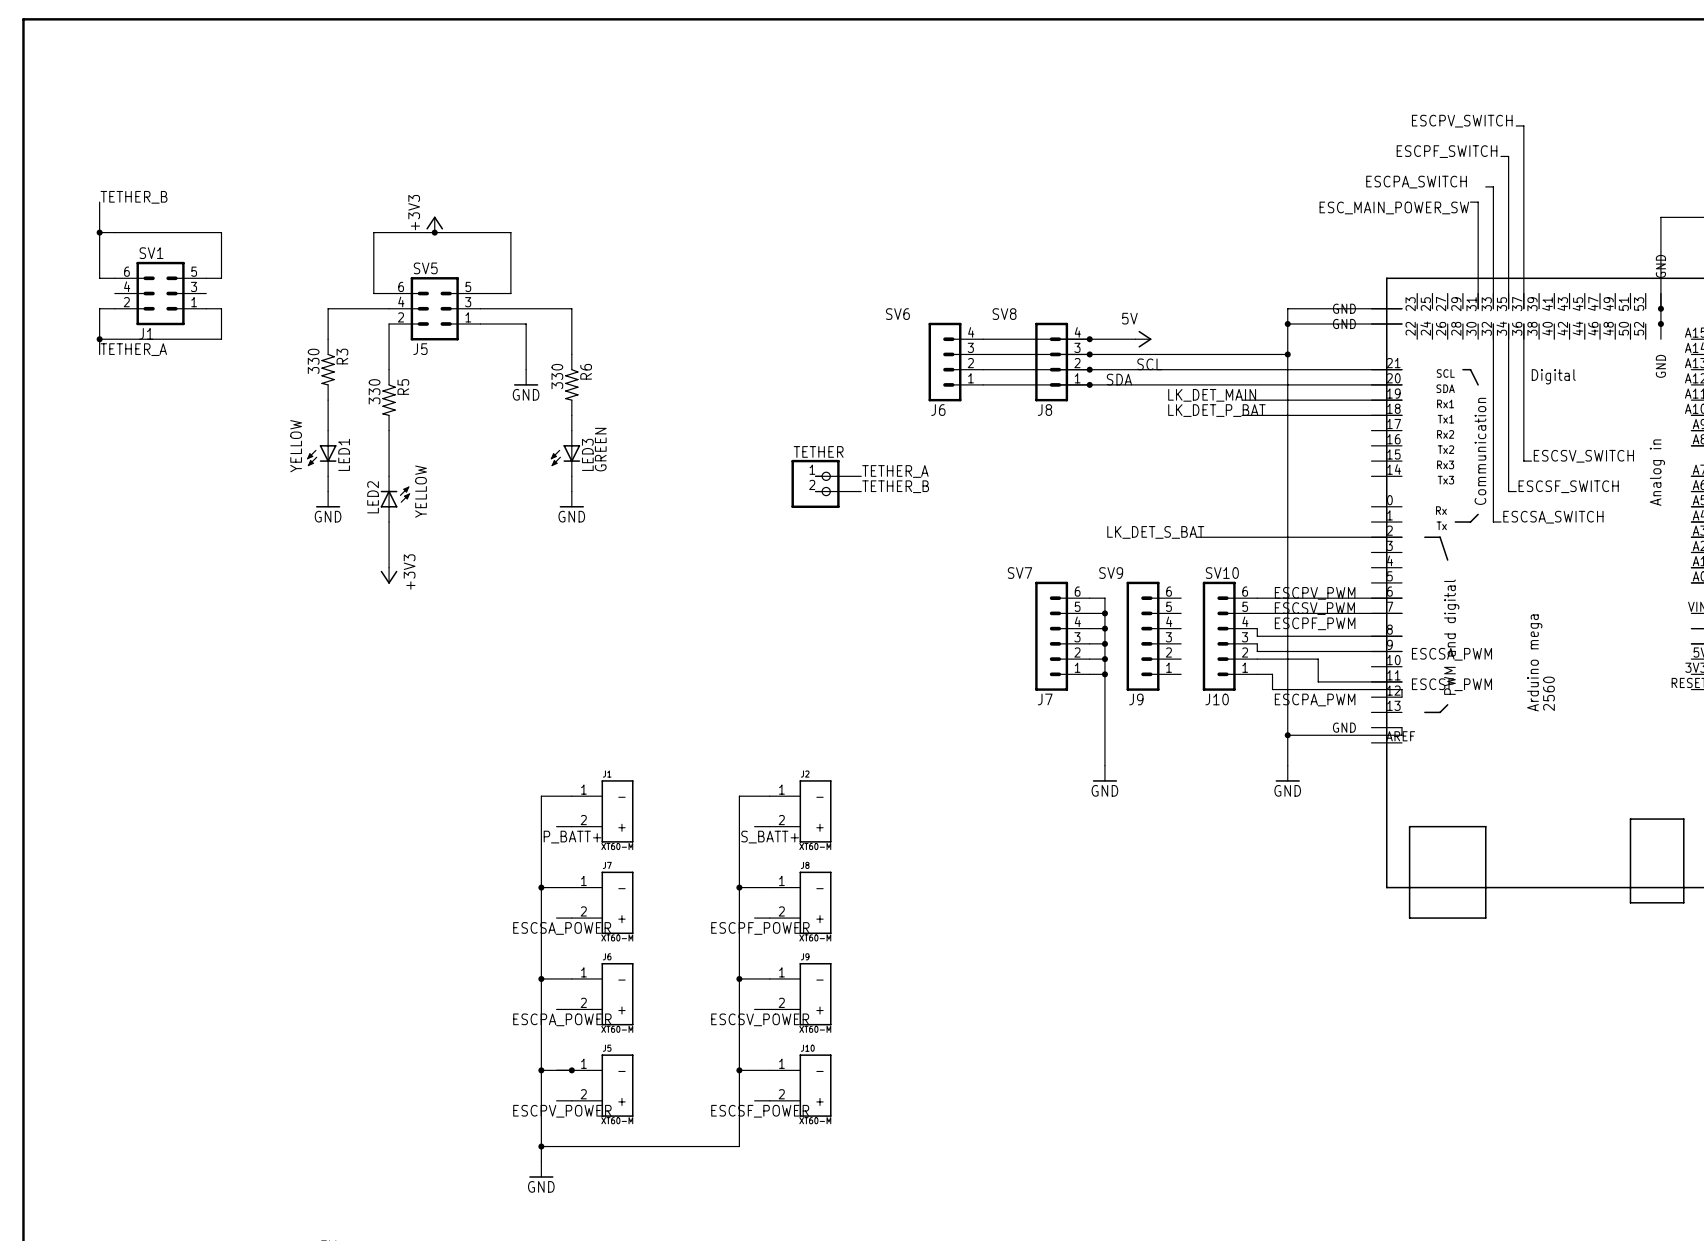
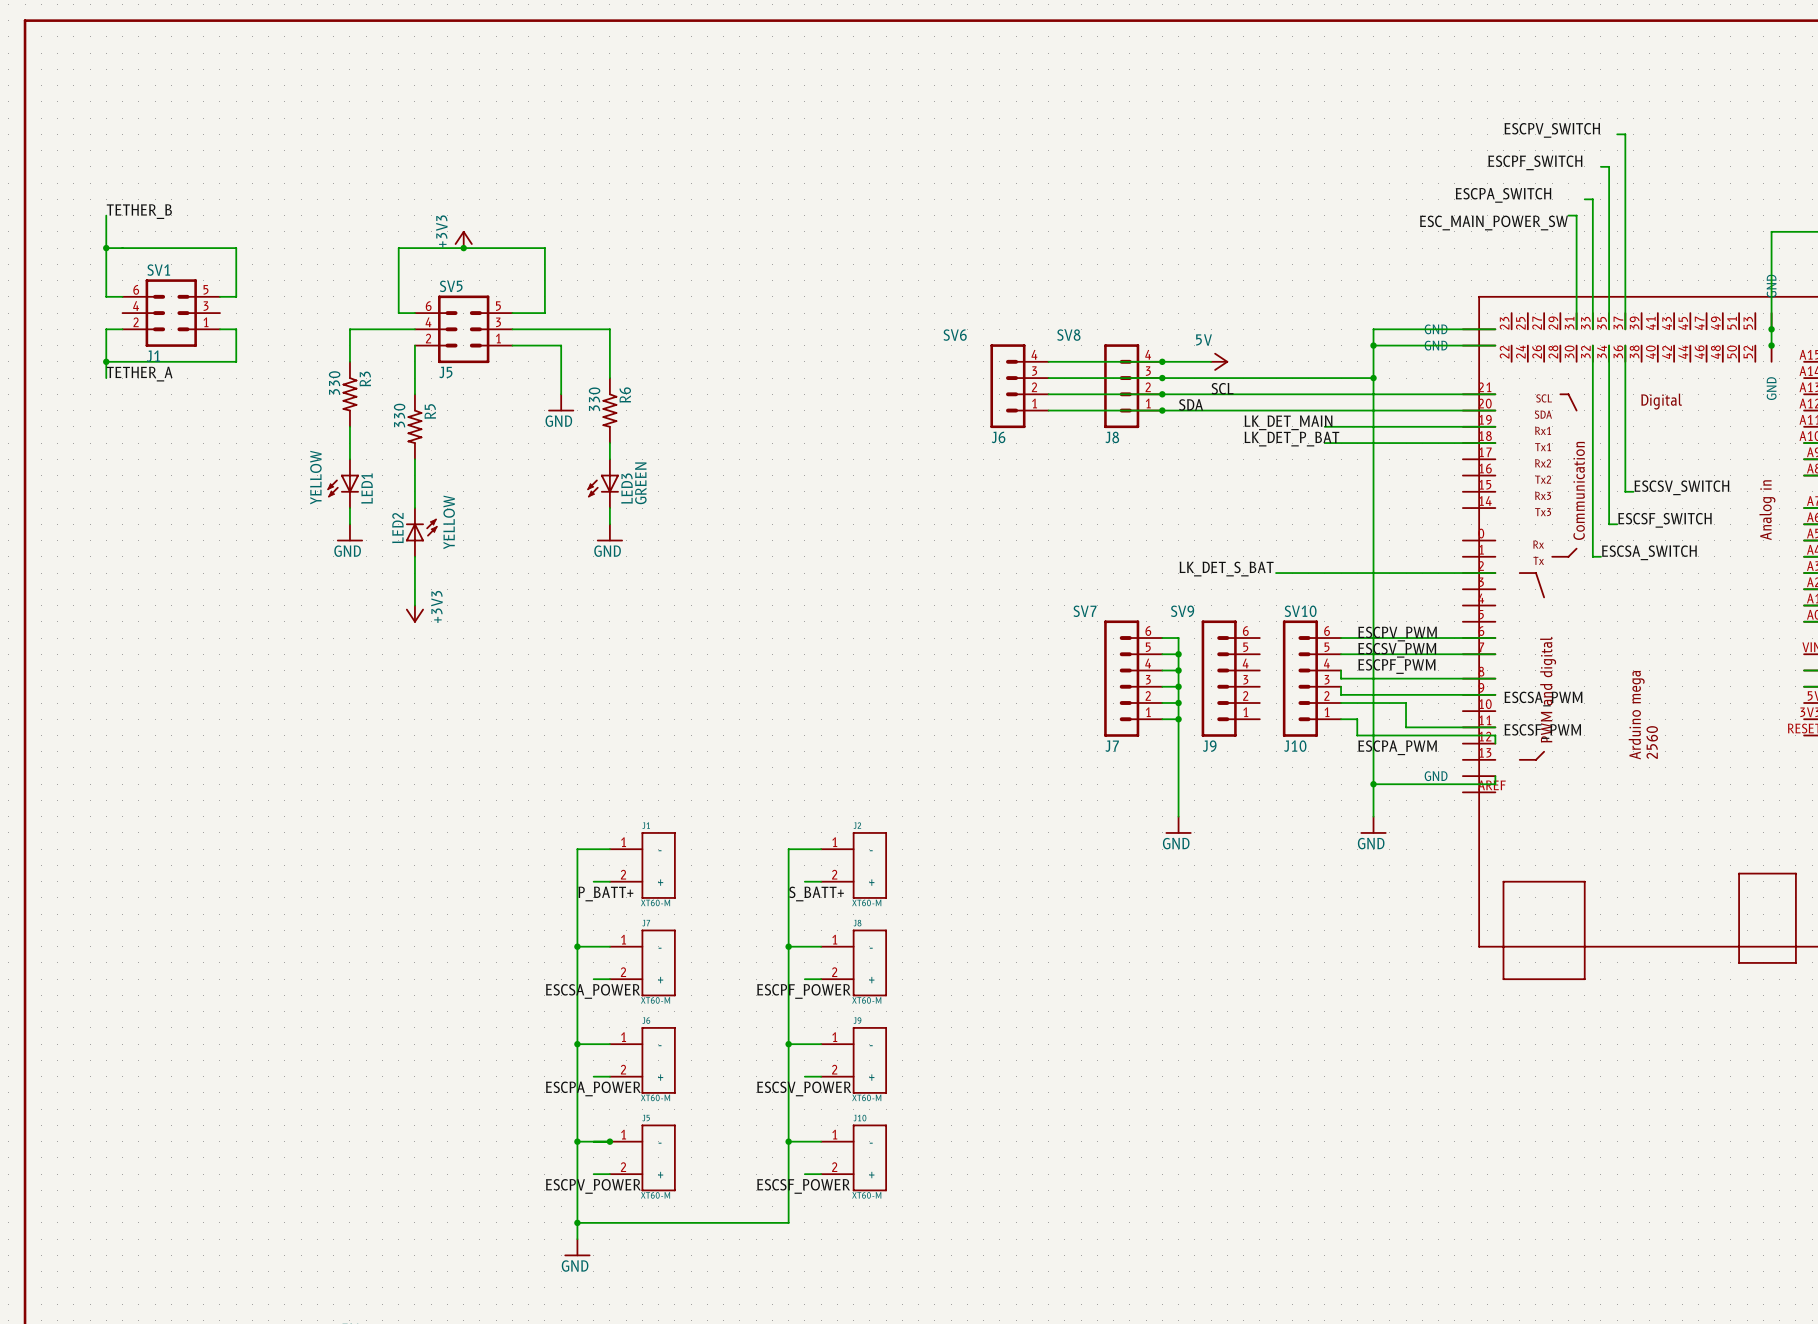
label: TETHER_A (895, 471) -> none
wire: (815, 476) (861, 476) -> none
TETHER: (815, 483) -> none
label: TETHER_B (895, 486) -> none
wire: (815, 491) (861, 491) -> none

